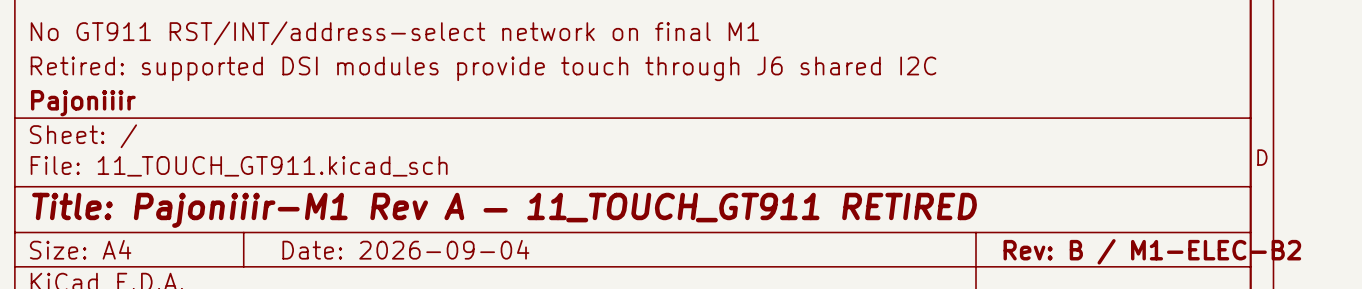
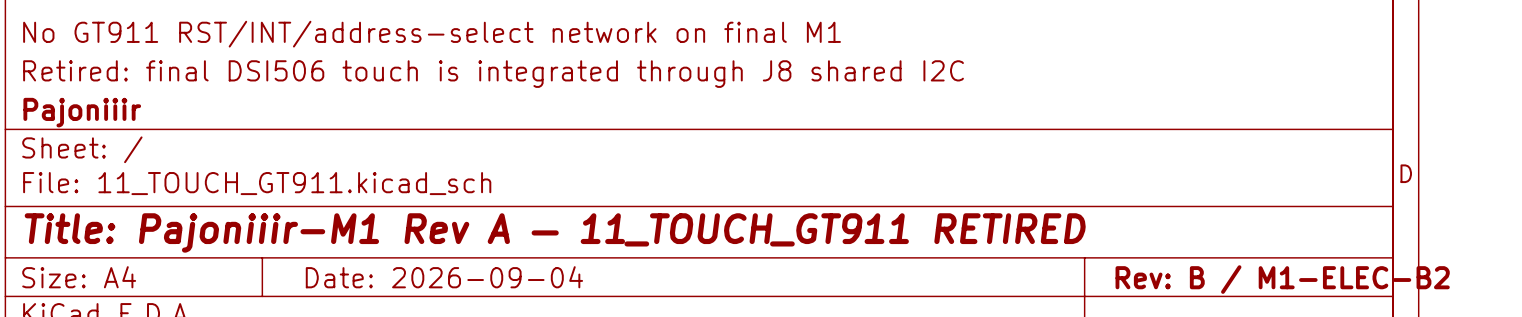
title block: Retired: supported DSI modules provide touch through J6 shared I2C (483, 68) -> Retired: final DSI506 touch is integrated through J8 shared I2C (493, 74)

